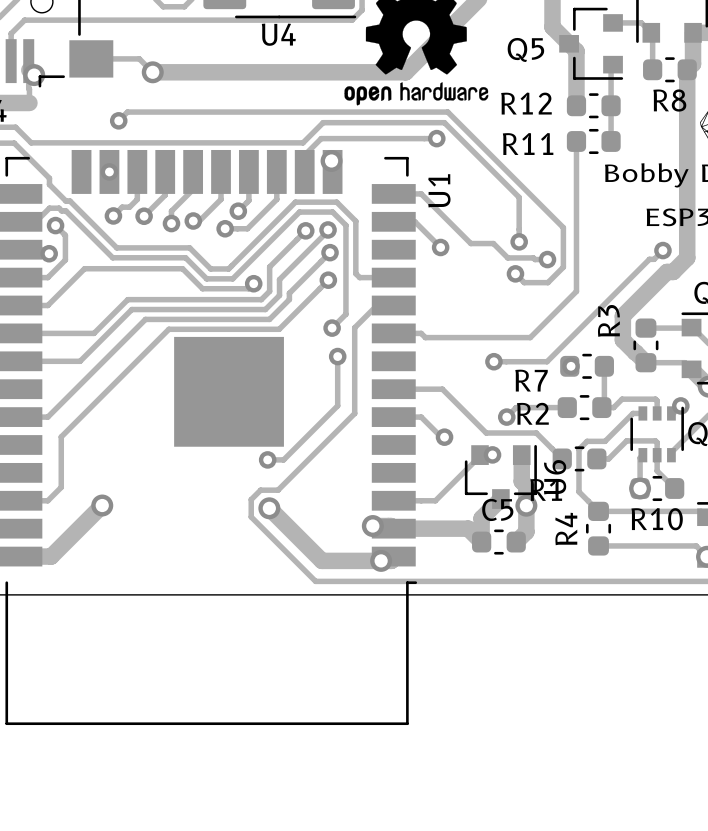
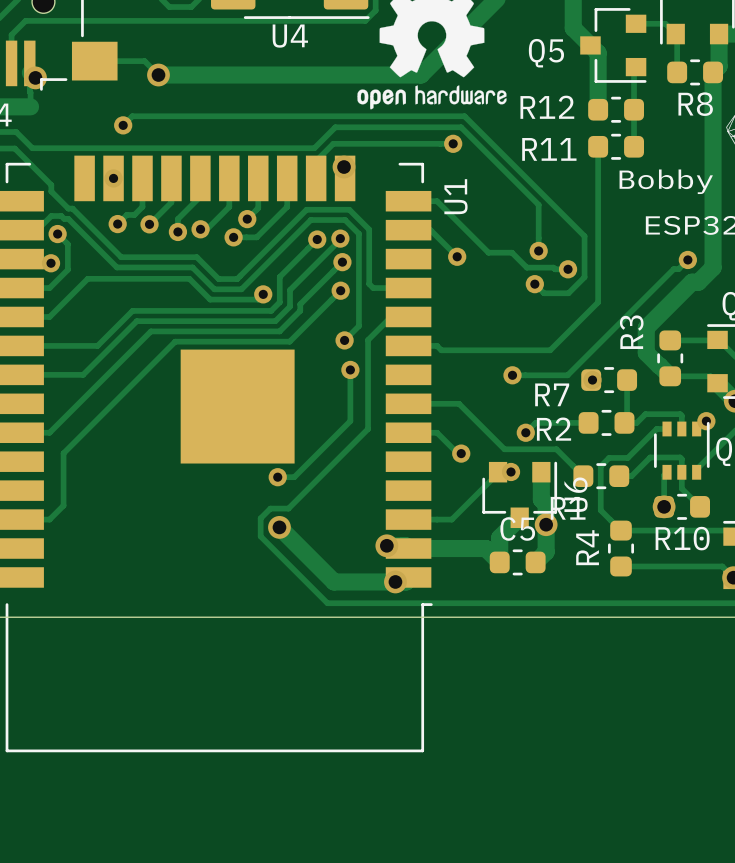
track: (102, 505) (51, 556) (20, 556) -> none
via: (102, 505) -> none

